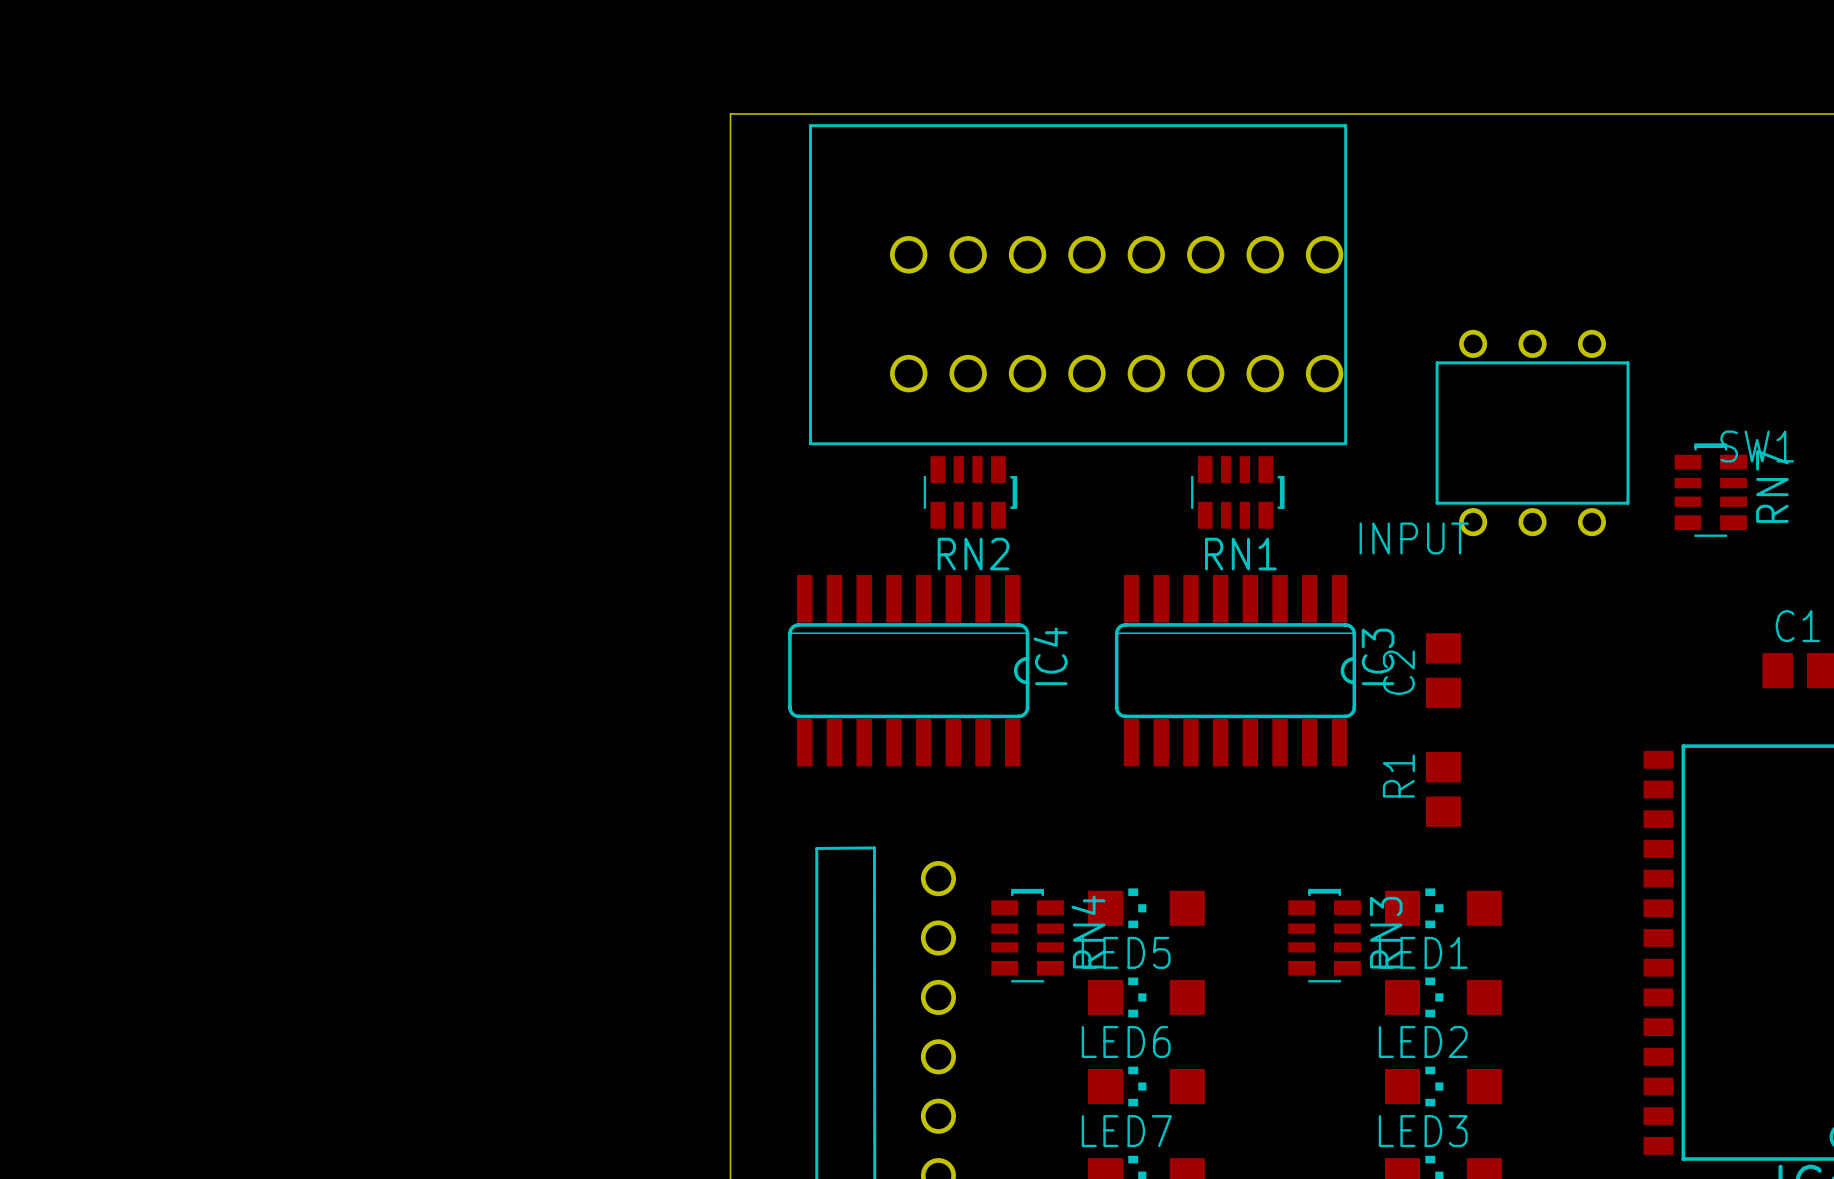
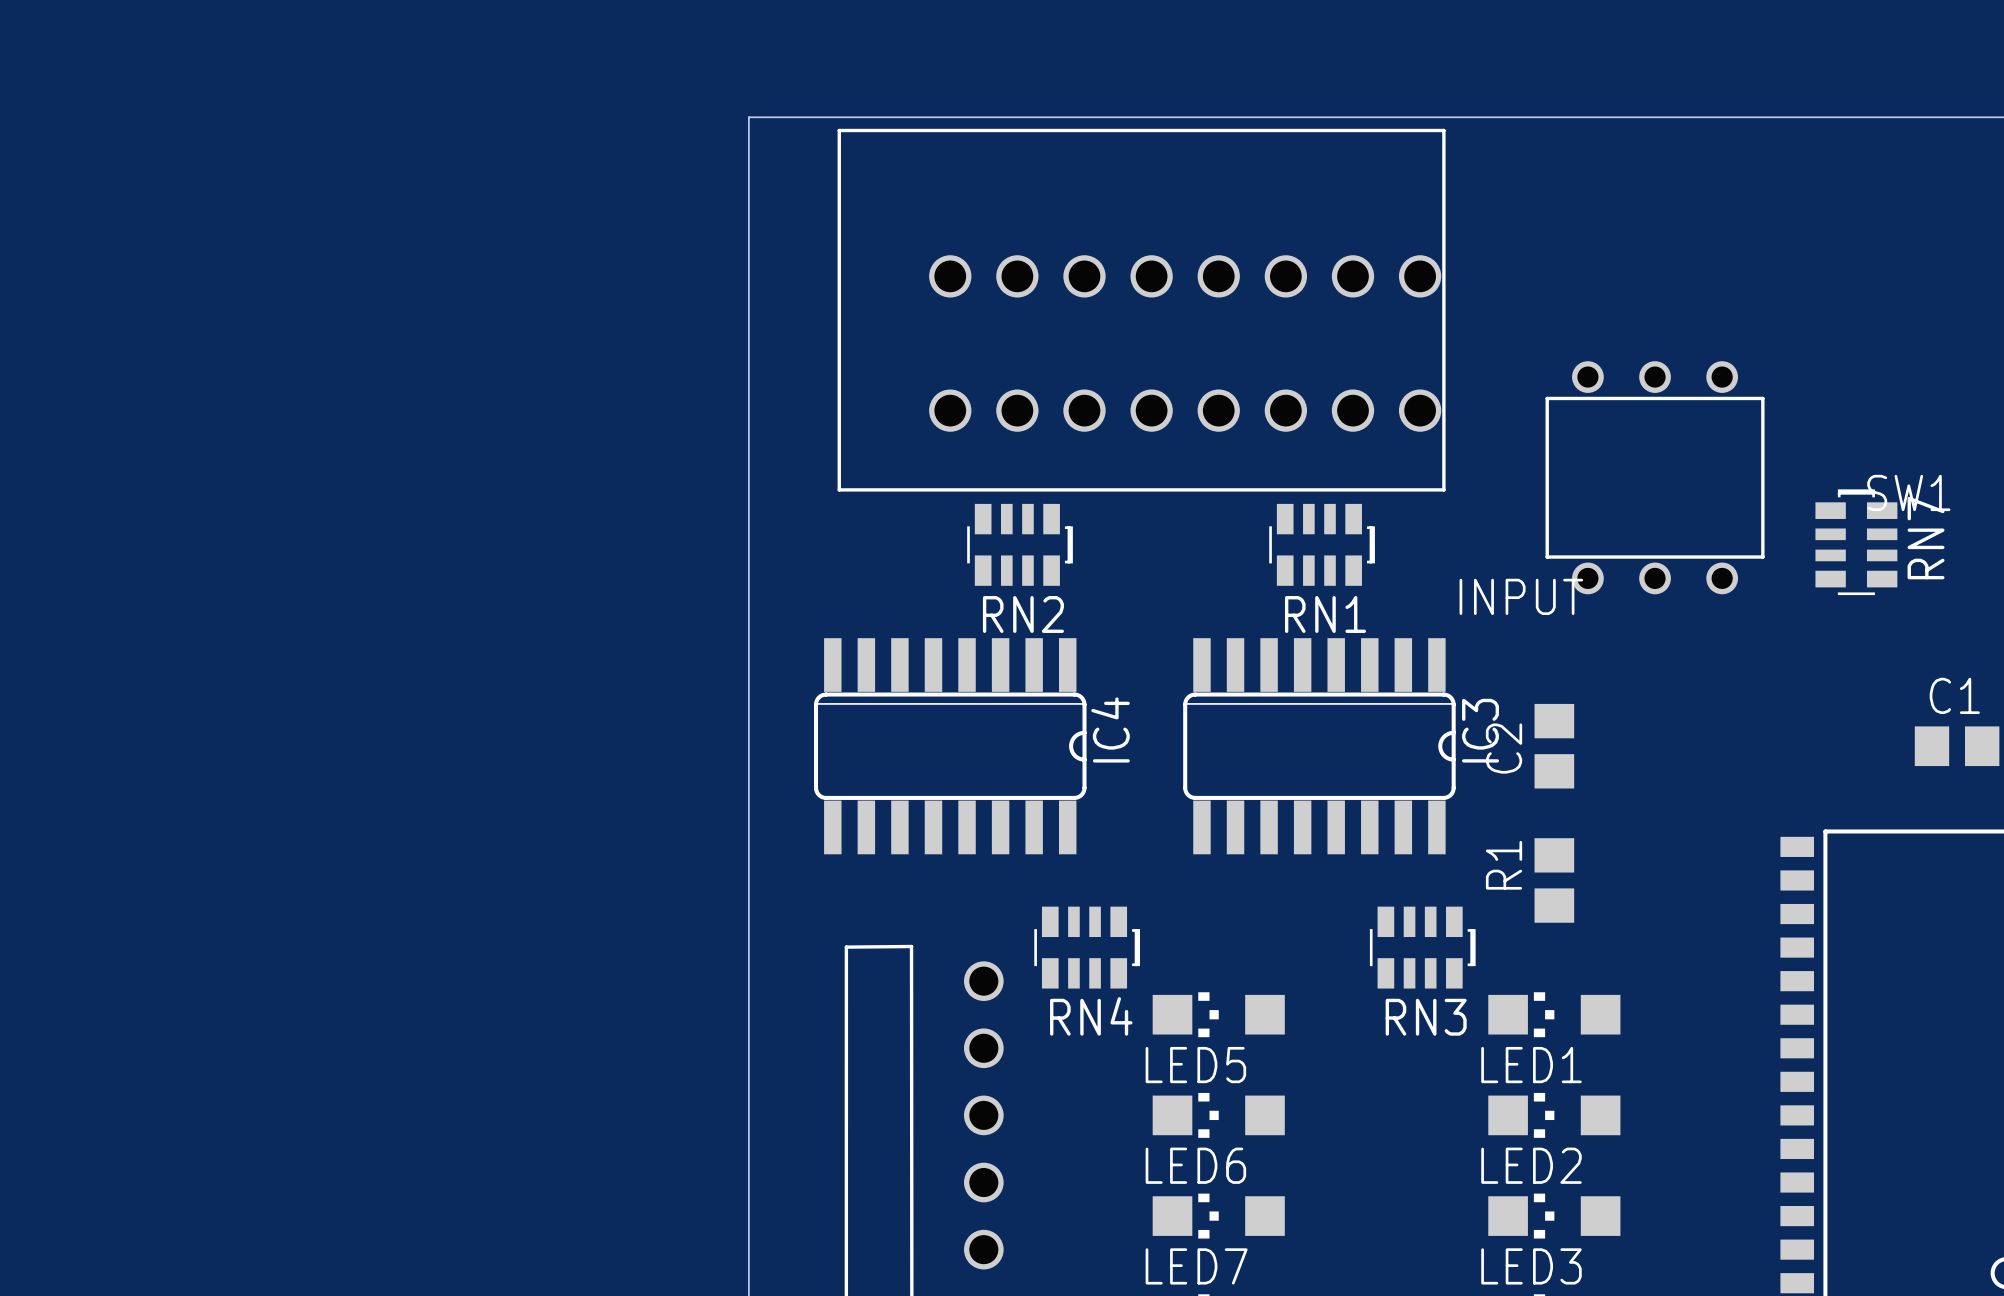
RN4 rotation: 0° (1027, 935) -> 90° clockwise (1087, 947)
RN4 position: (1027, 935) -> (1087, 947)
RN3 rotation: 0° (1324, 935) -> 90° clockwise (1422, 947)
RN3 position: (1324, 935) -> (1422, 947)

